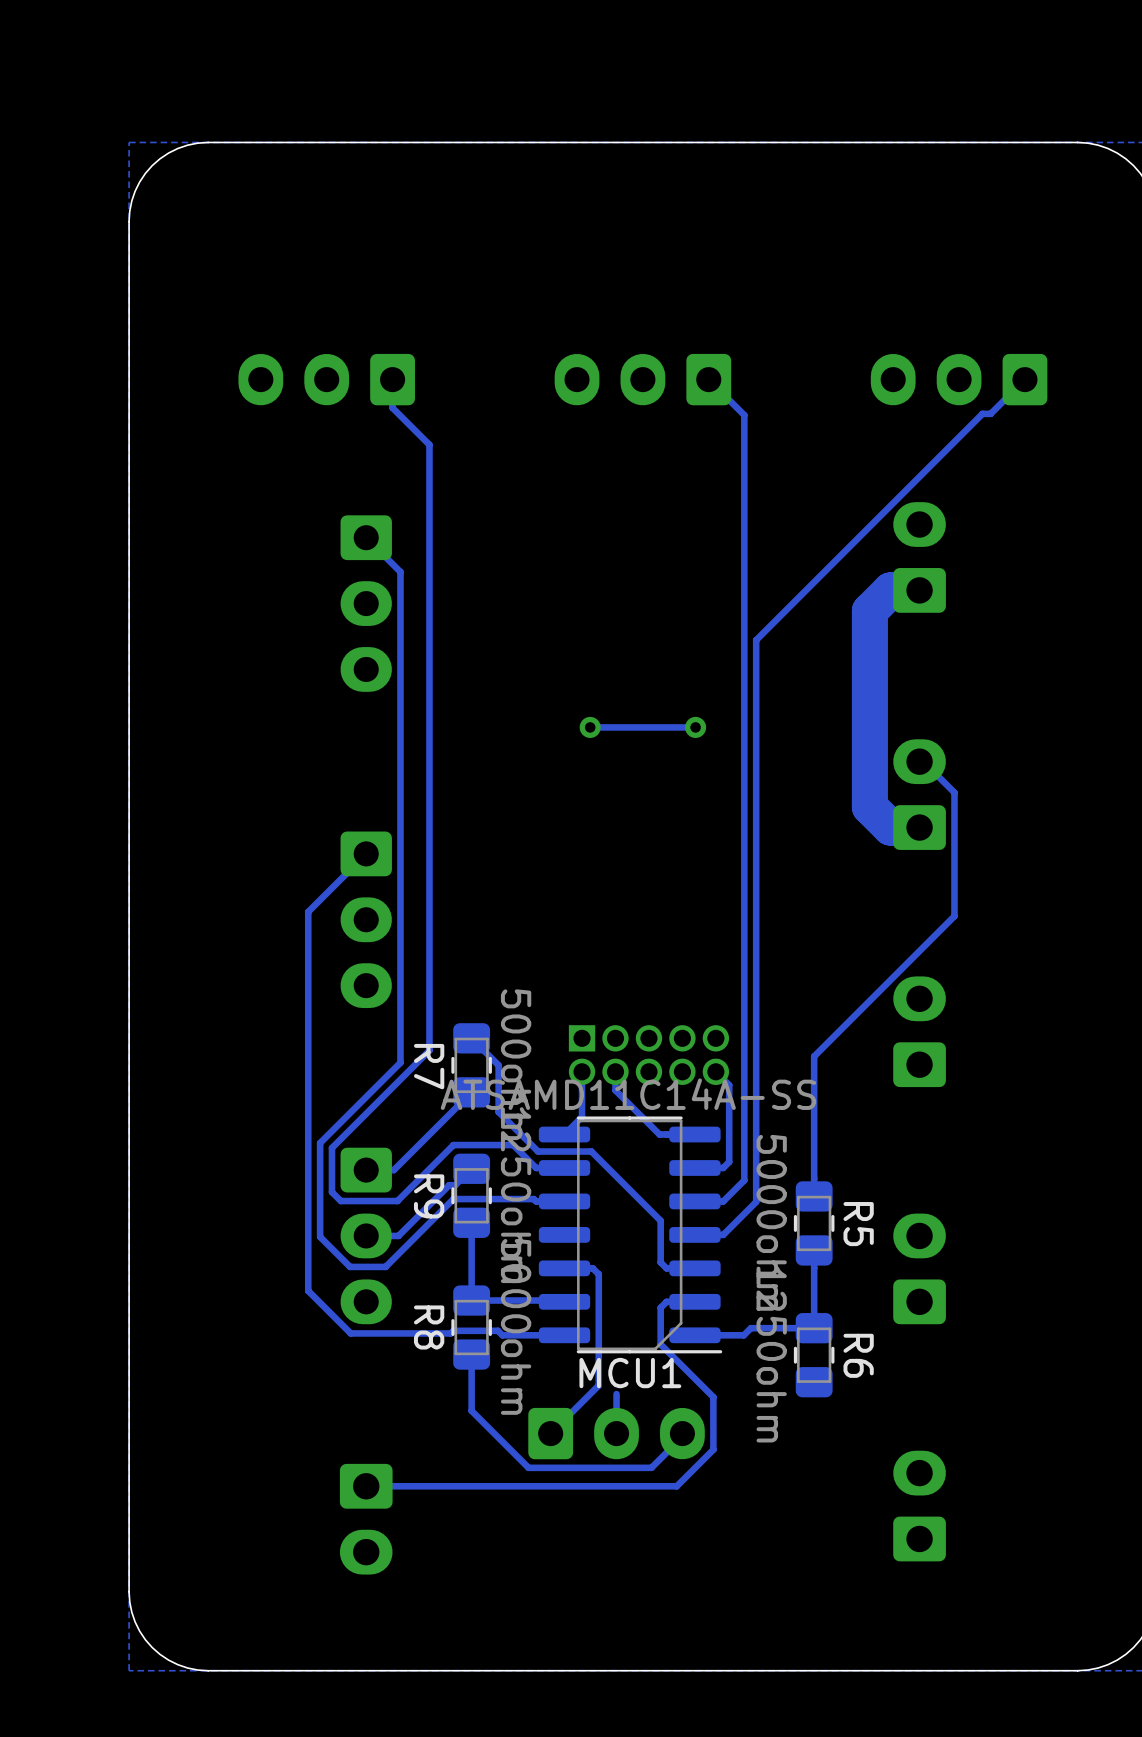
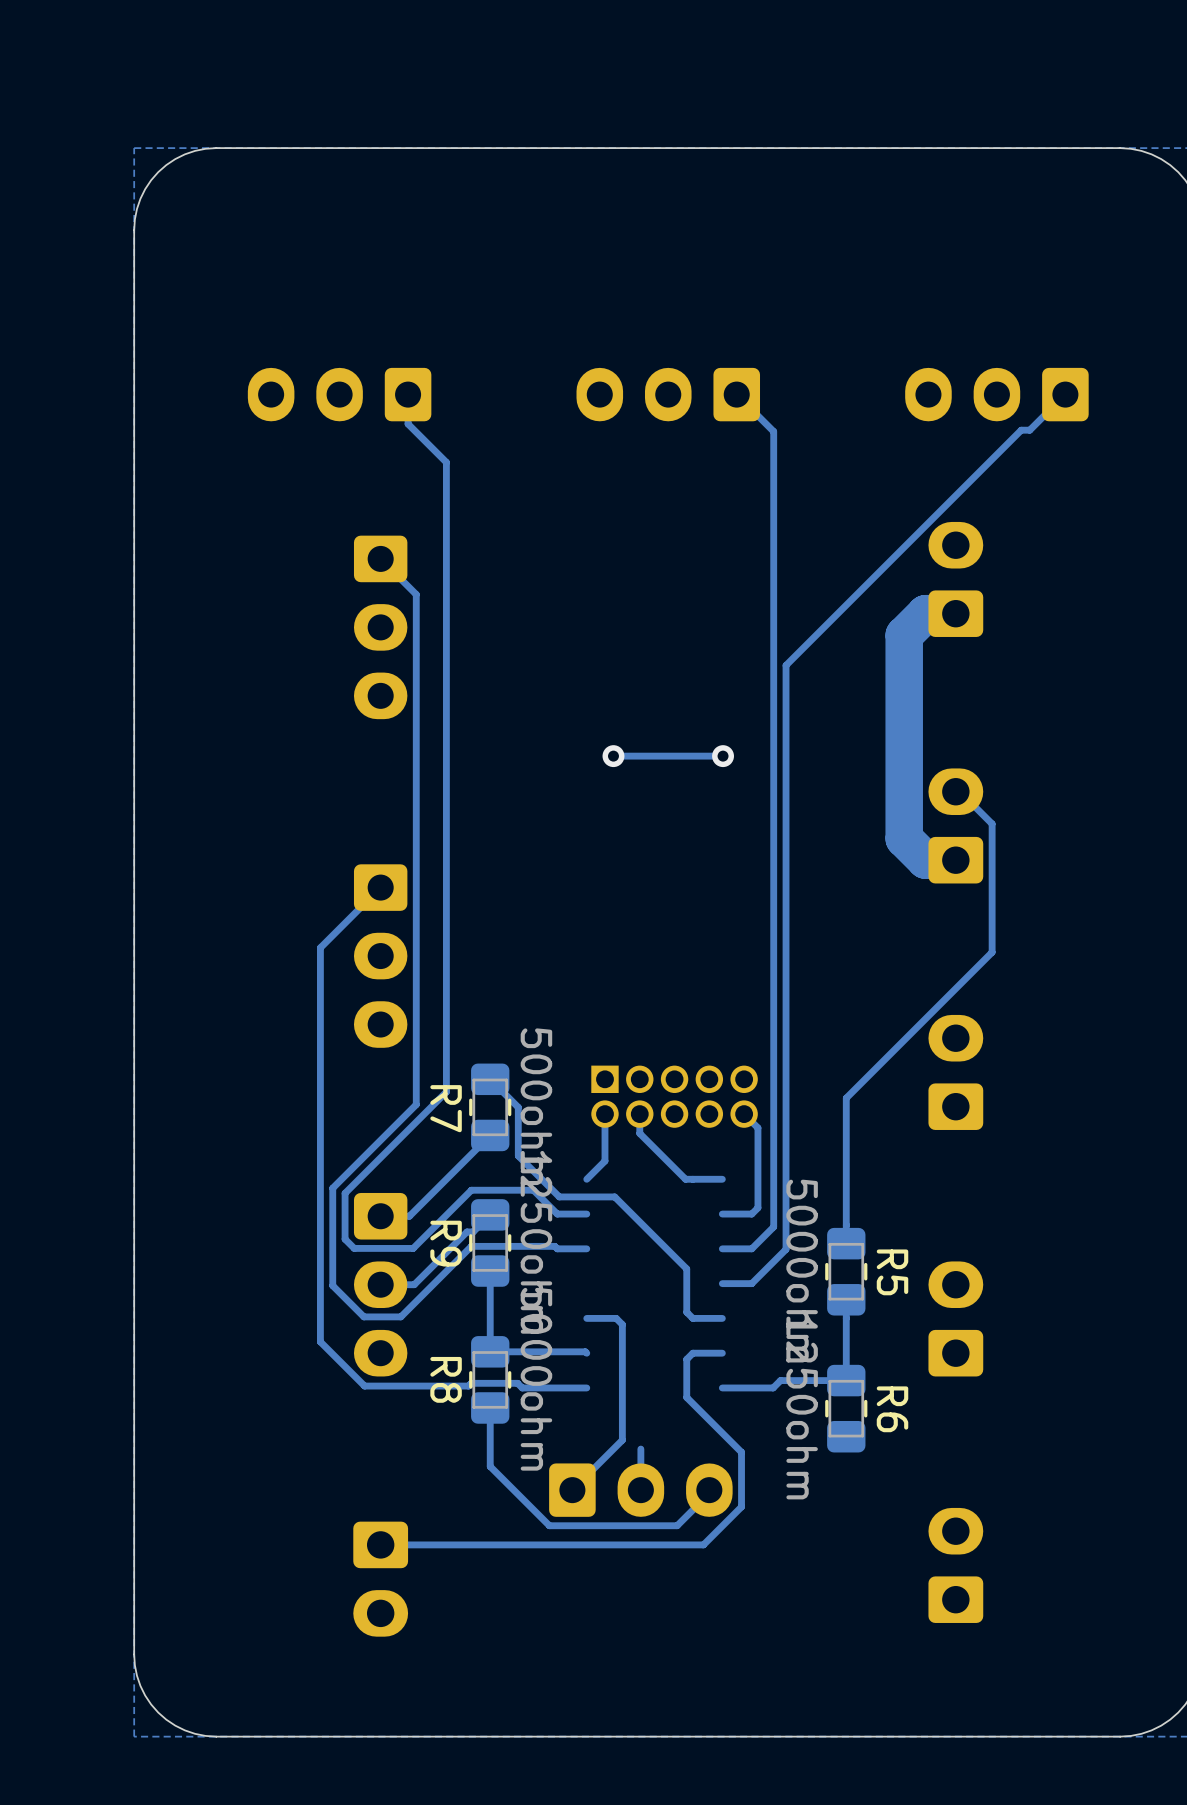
MCU1: ATSAMD11C14A-SS (630, 1234) -> none

